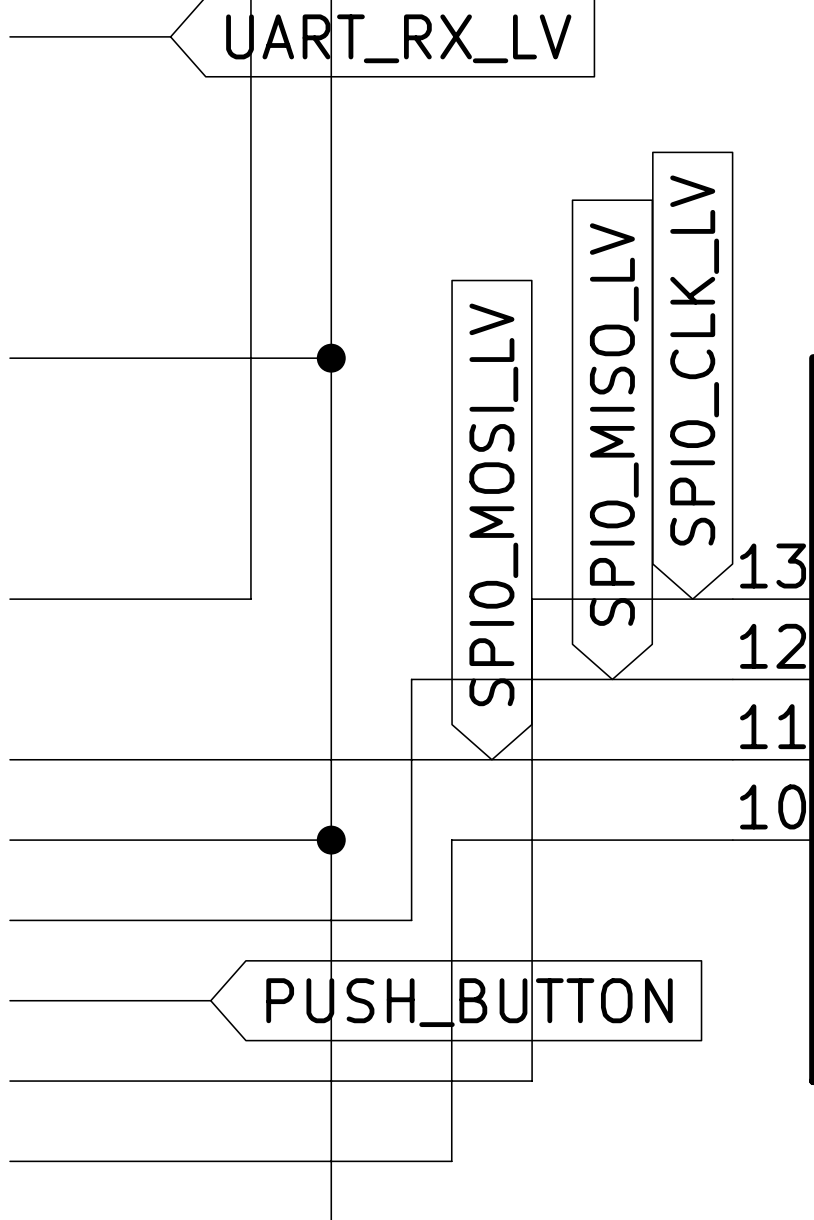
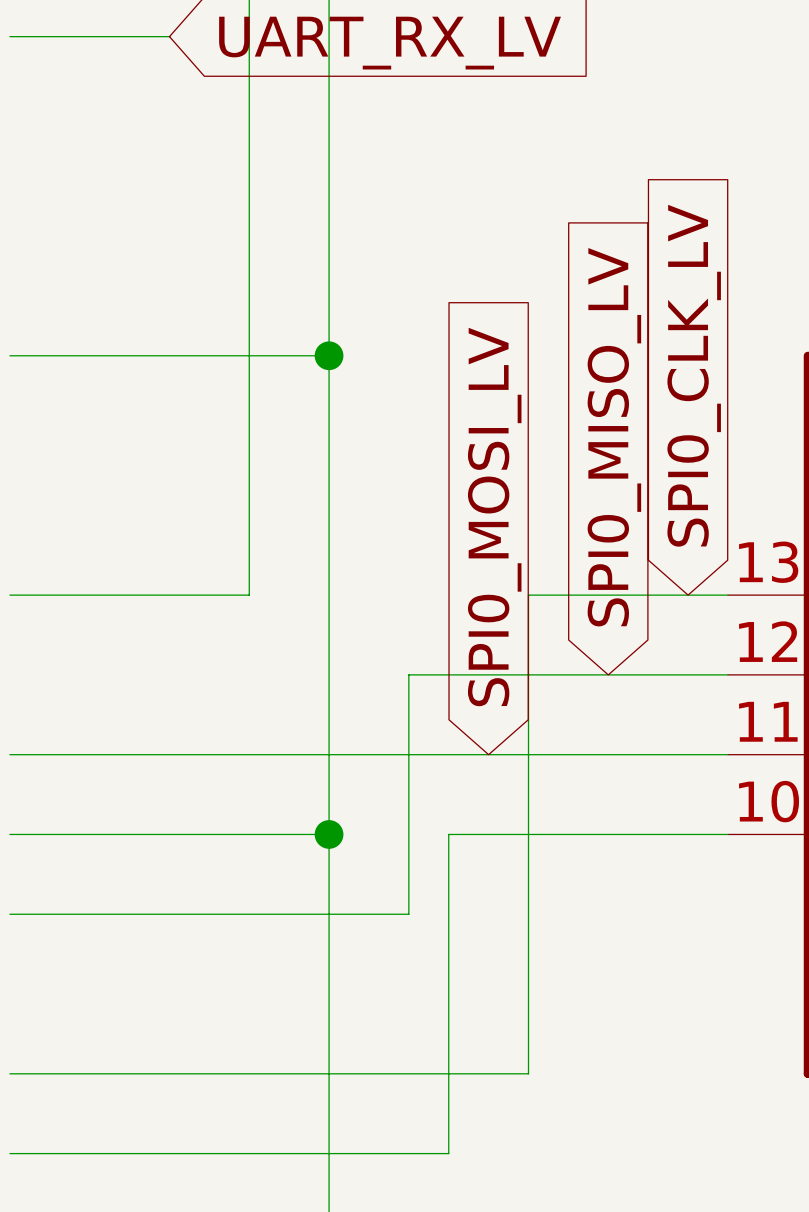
wire: (10, 1000) (210, 1000) -> none
global label: PUSH_BUTTON (469, 1002) -> none

